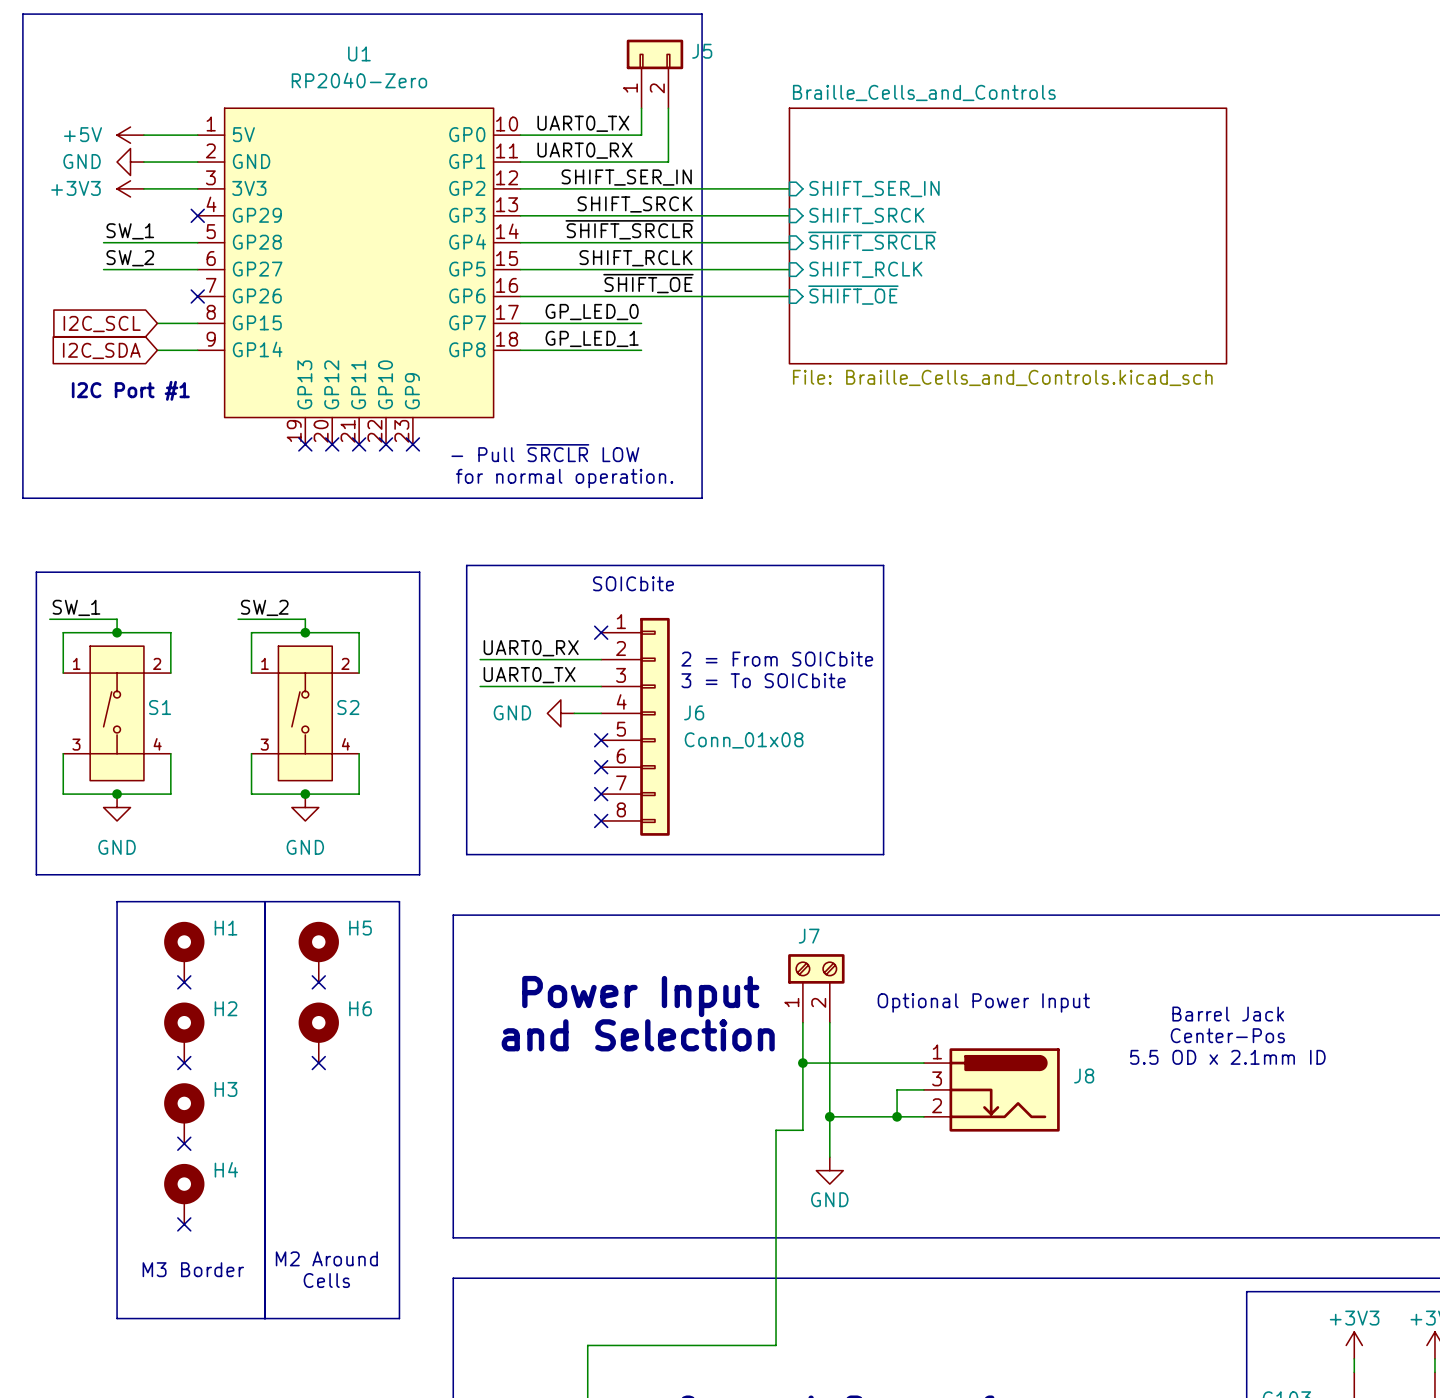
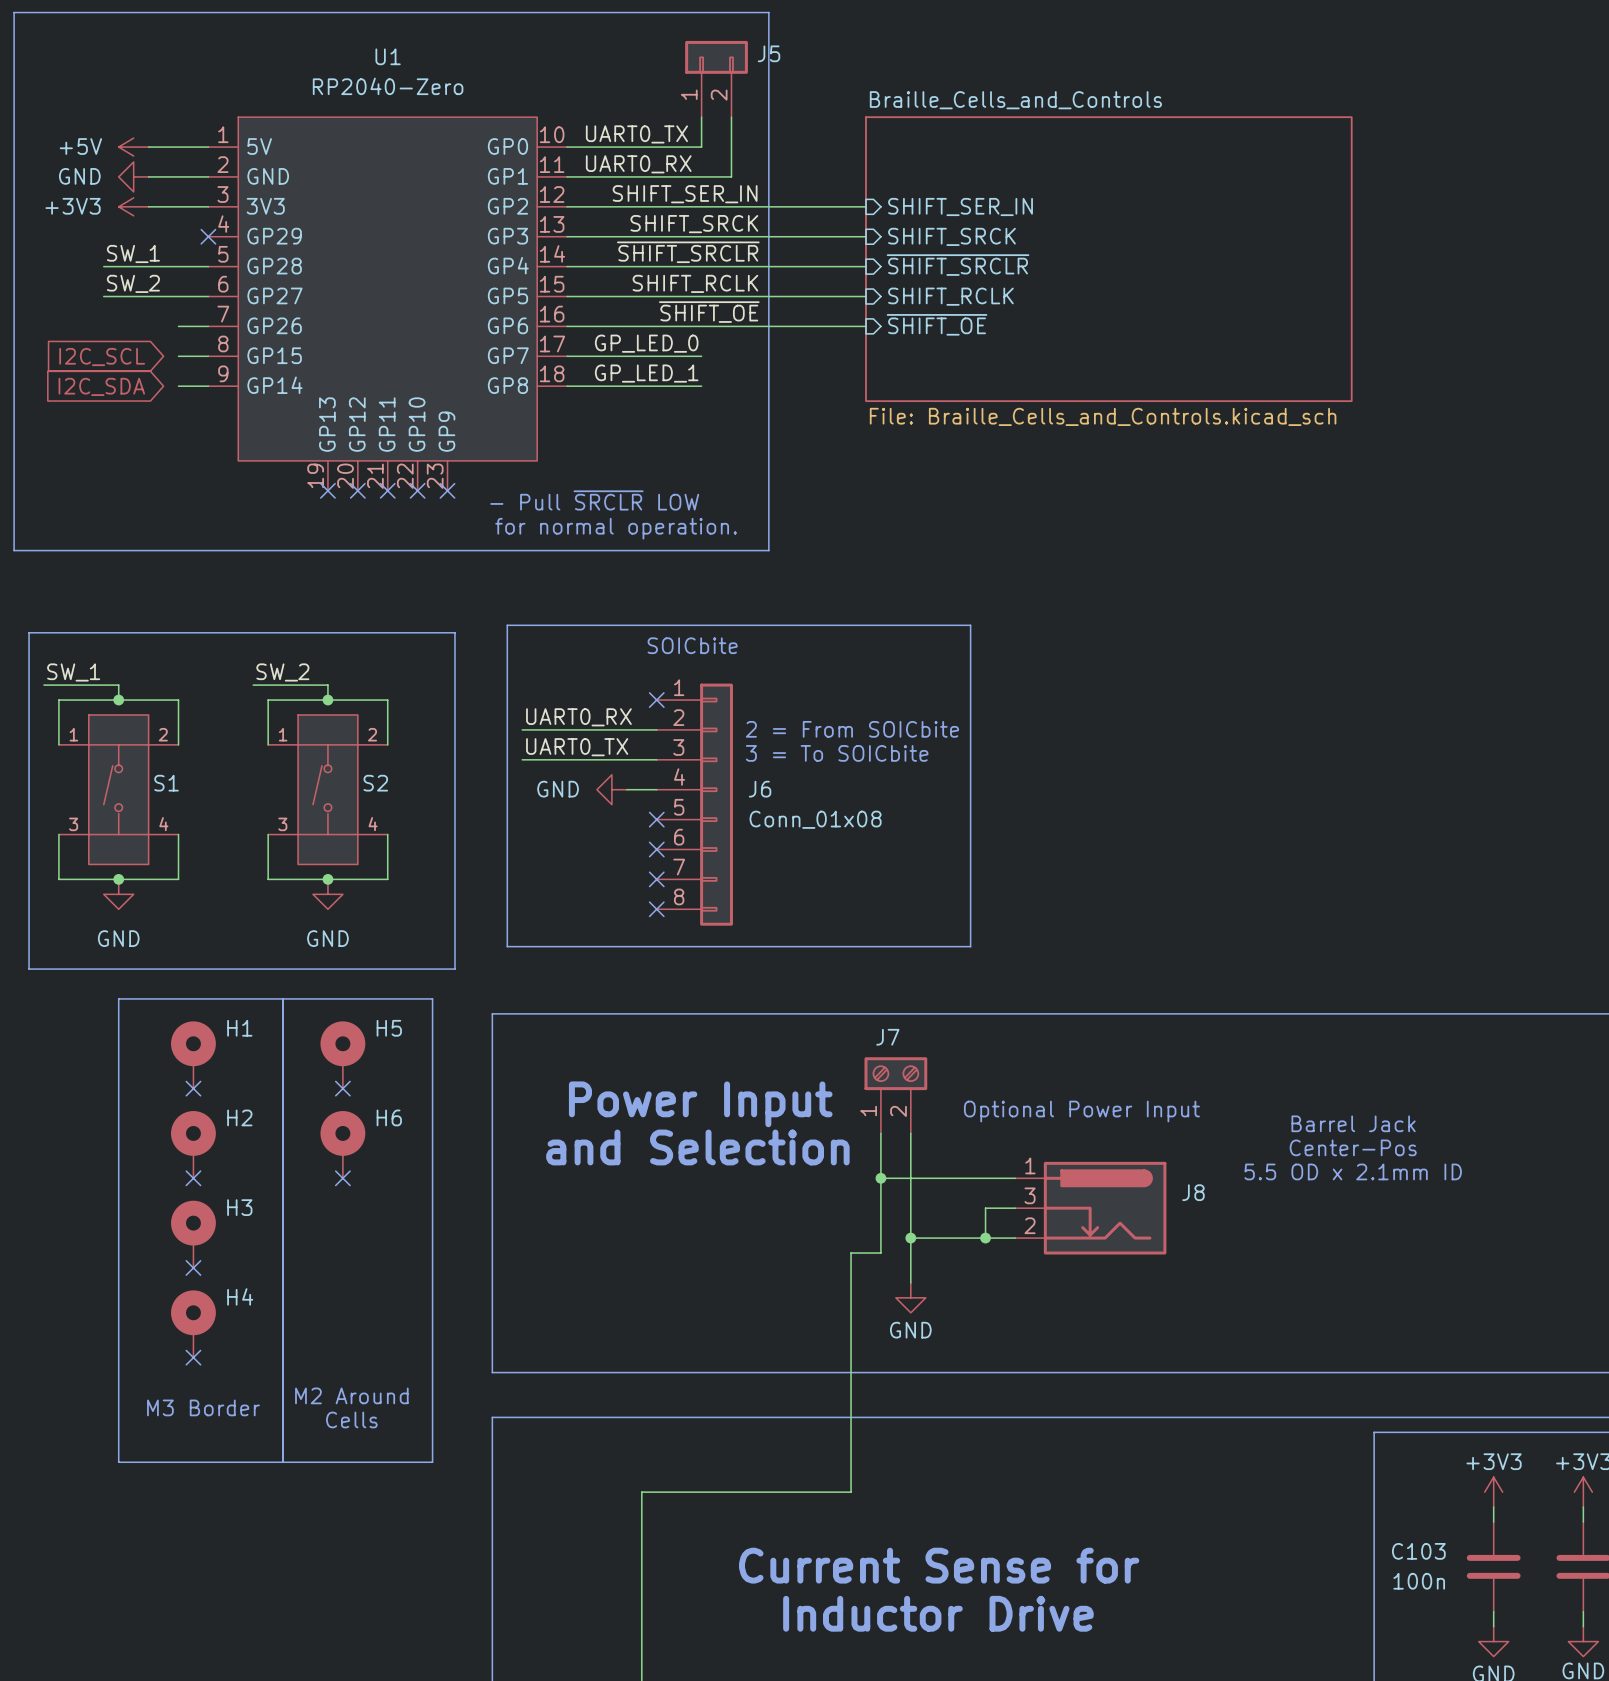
wire: none -> (178, 326) (208, 326)
no-connect mark: (197, 296) -> none
wire: (157, 323) (170, 323) -> none
wire: (157, 350) (170, 350) -> none
text: I2C Port #1 (130, 390) -> none

